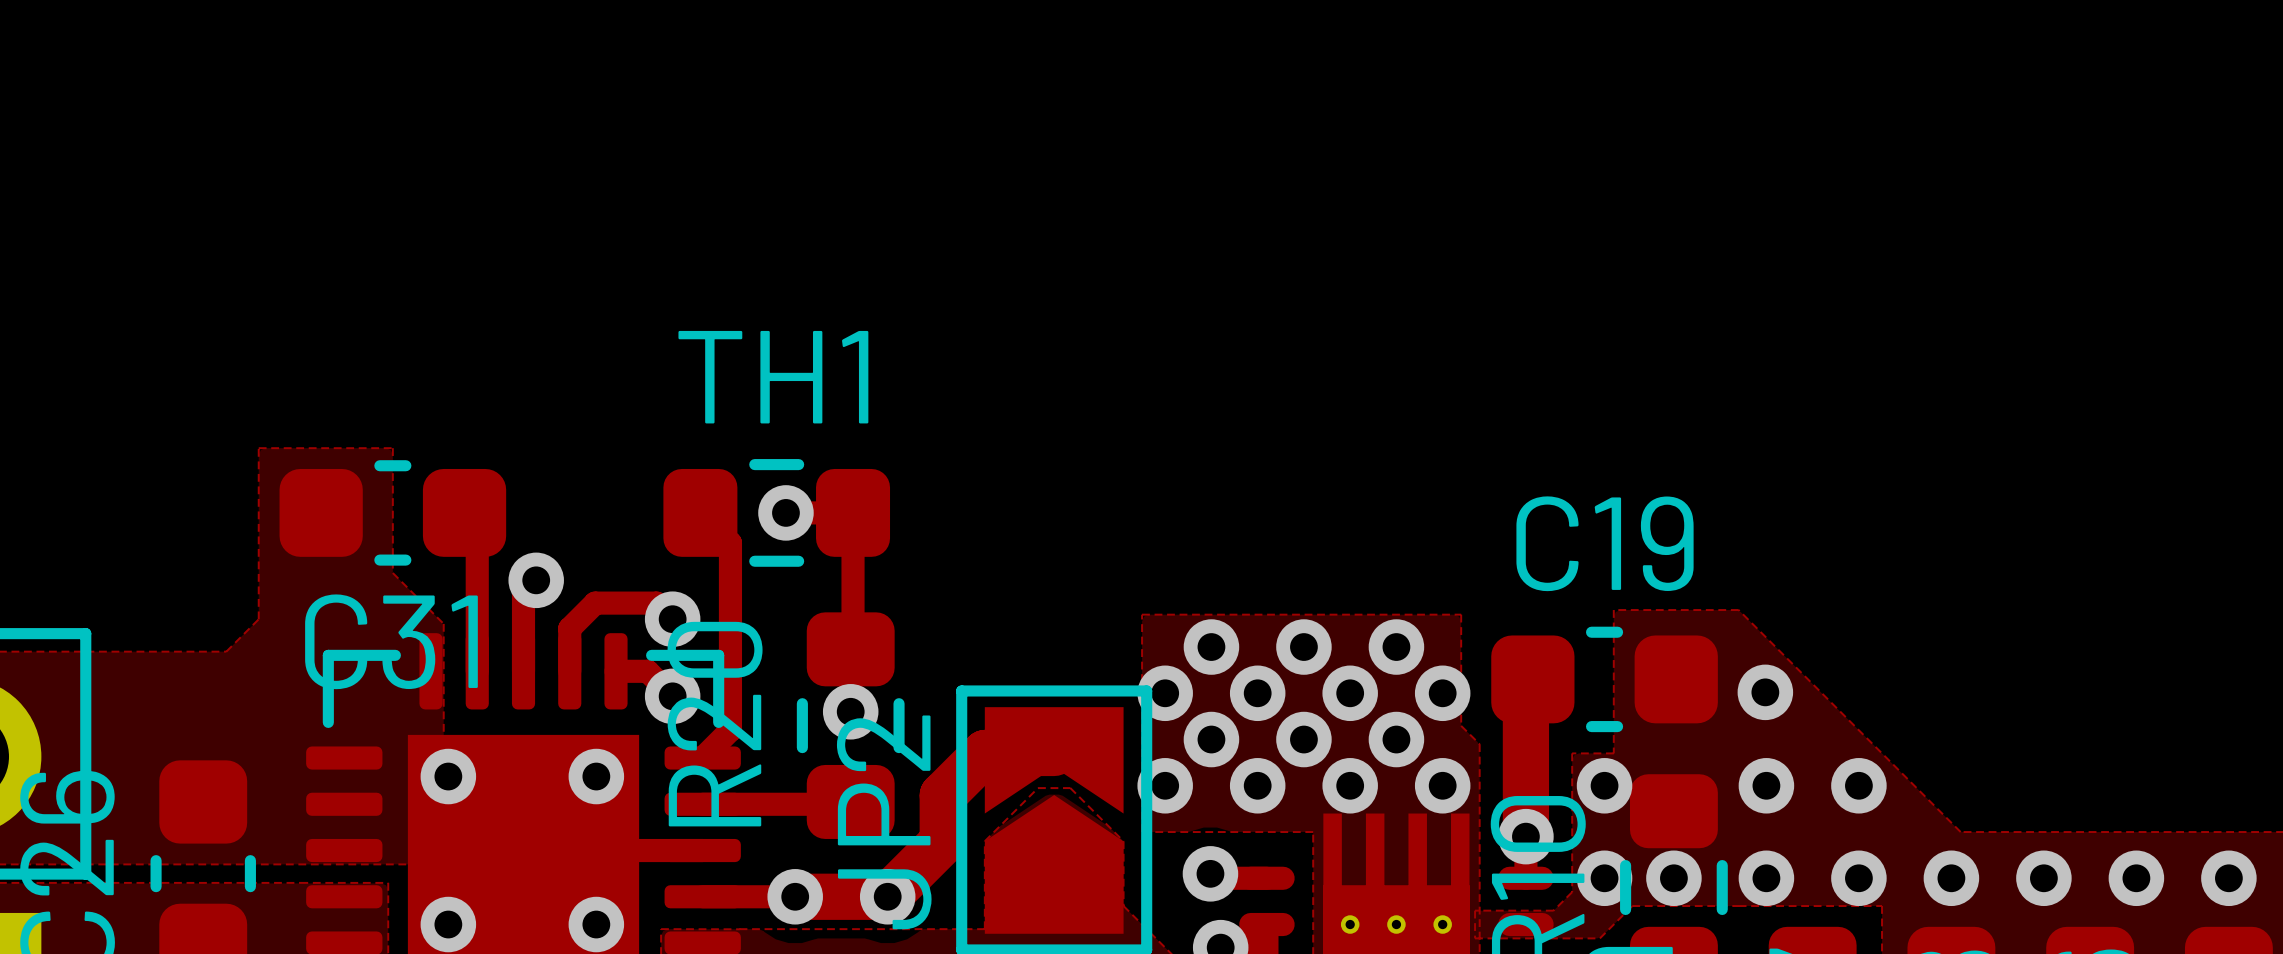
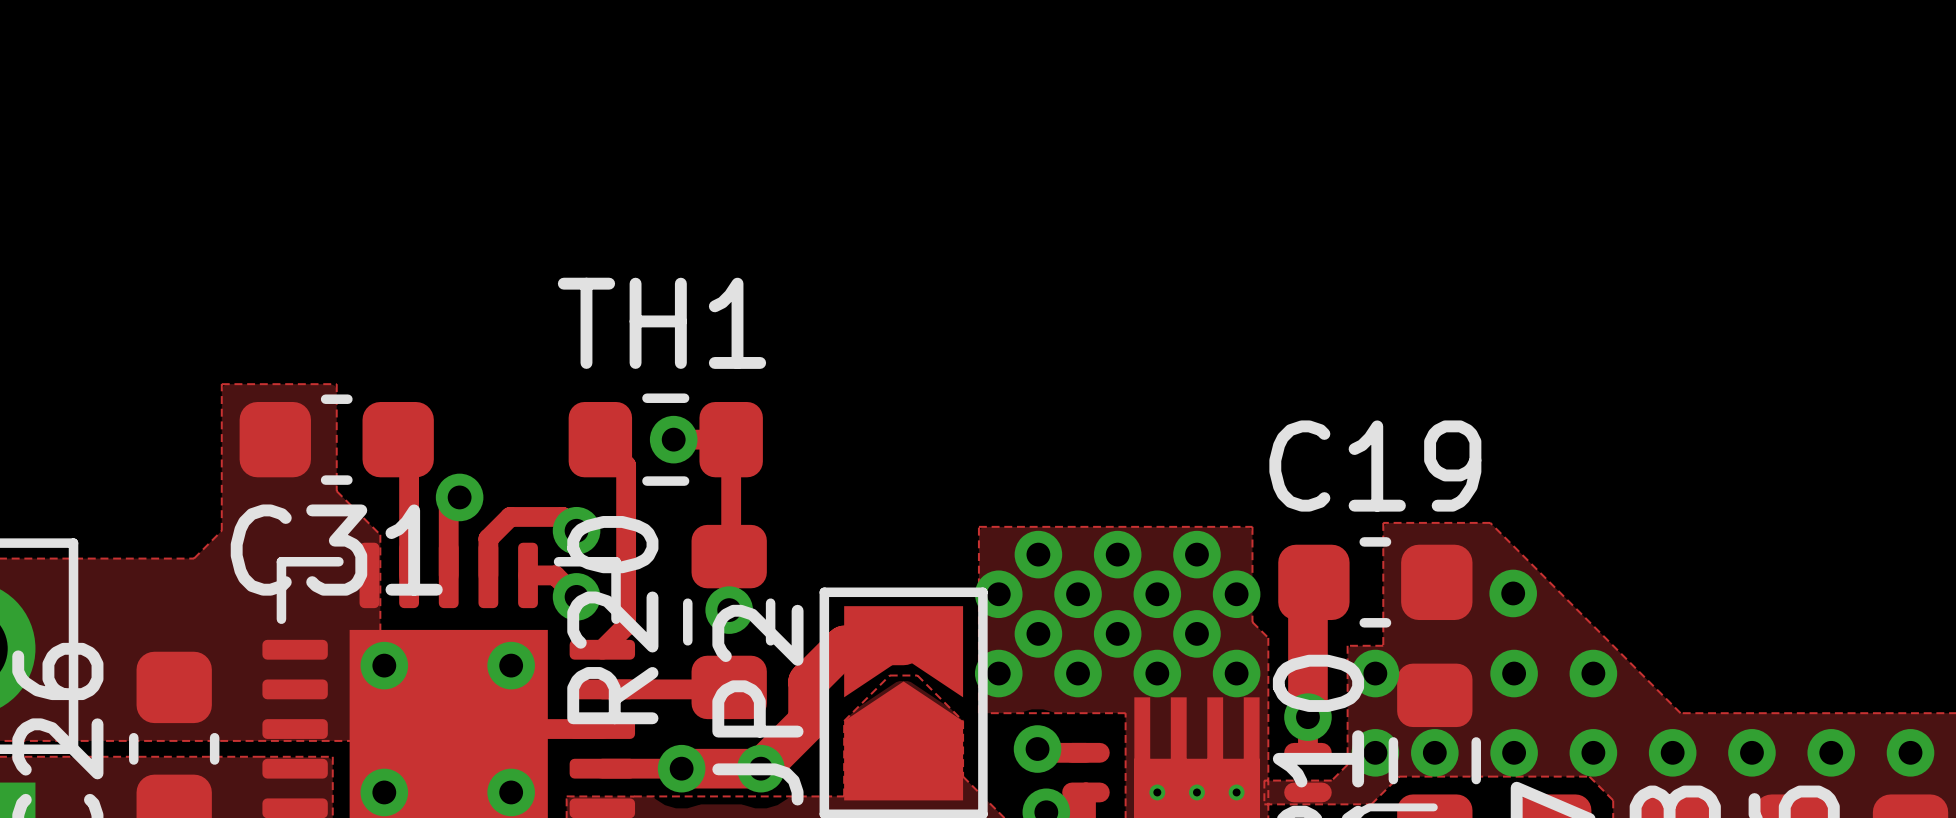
zone outline: (1854, 906) (1882, 906) (1882, 933) -> (1589, 776) (1613, 800)

